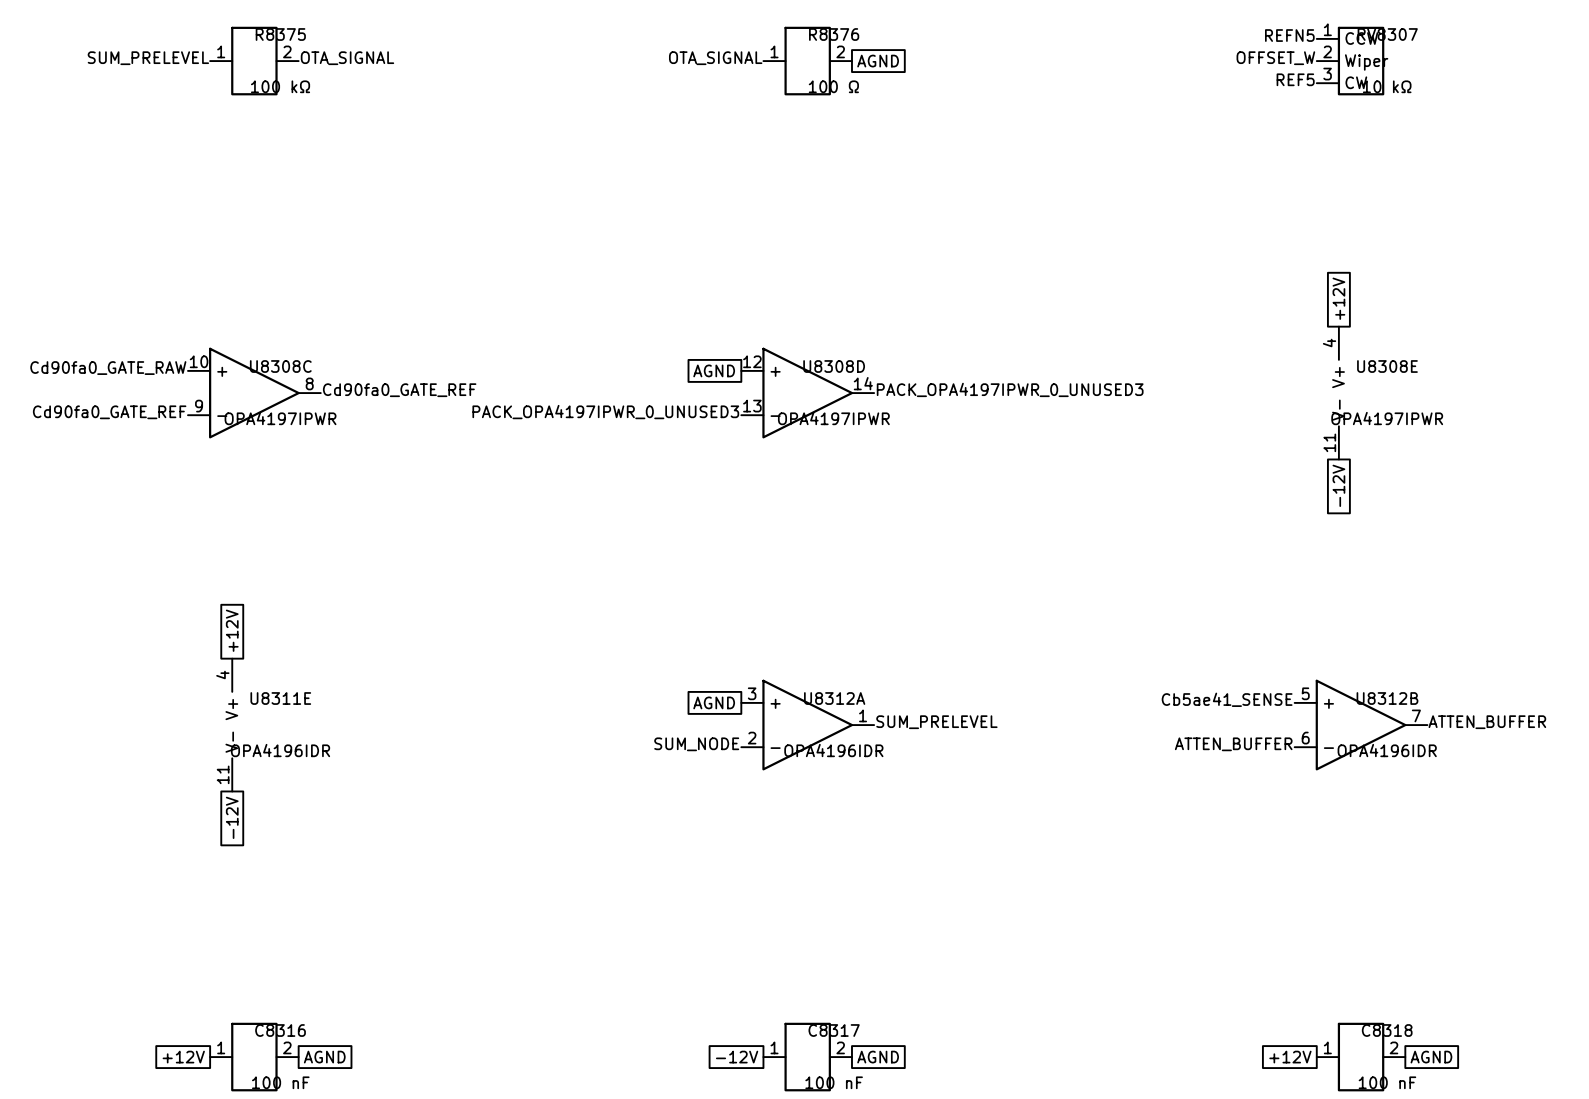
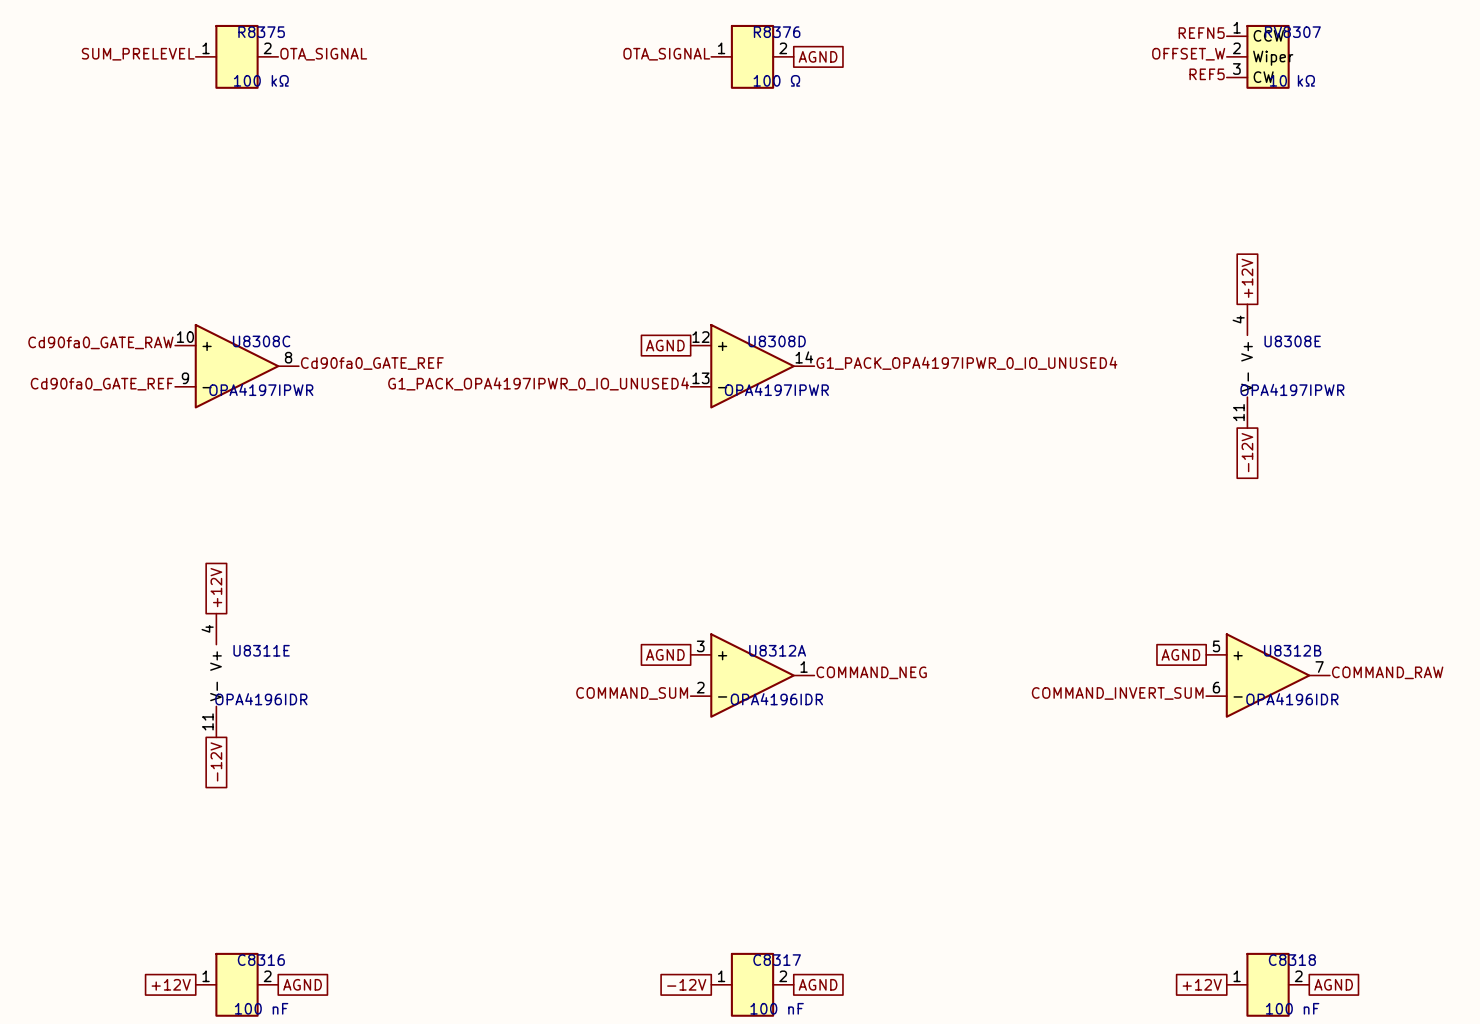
label: PACK_OPA4197IPWR_0_UNUSED3 (1010, 389) -> G1_PACK_OPA4197IPWR_0_IO_UNUSED4 (966, 363)
label: PACK_OPA4197IPWR_0_UNUSED3 (605, 412) -> G1_PACK_OPA4197IPWR_0_IO_UNUSED4 (538, 383)
label: Cb5ae41_SENSE (1227, 699) -> none
global label: none -> AGND (1180, 654)
label: SUM_PRELEVEL (936, 722) -> COMMAND_NEG (871, 672)
label: ATTEN_BUFFER (1487, 722) -> COMMAND_RAW (1387, 672)
label: SUM_NODE (696, 744) -> COMMAND_SUM (632, 693)
label: ATTEN_BUFFER (1233, 744) -> COMMAND_INVERT_SUM (1117, 693)

